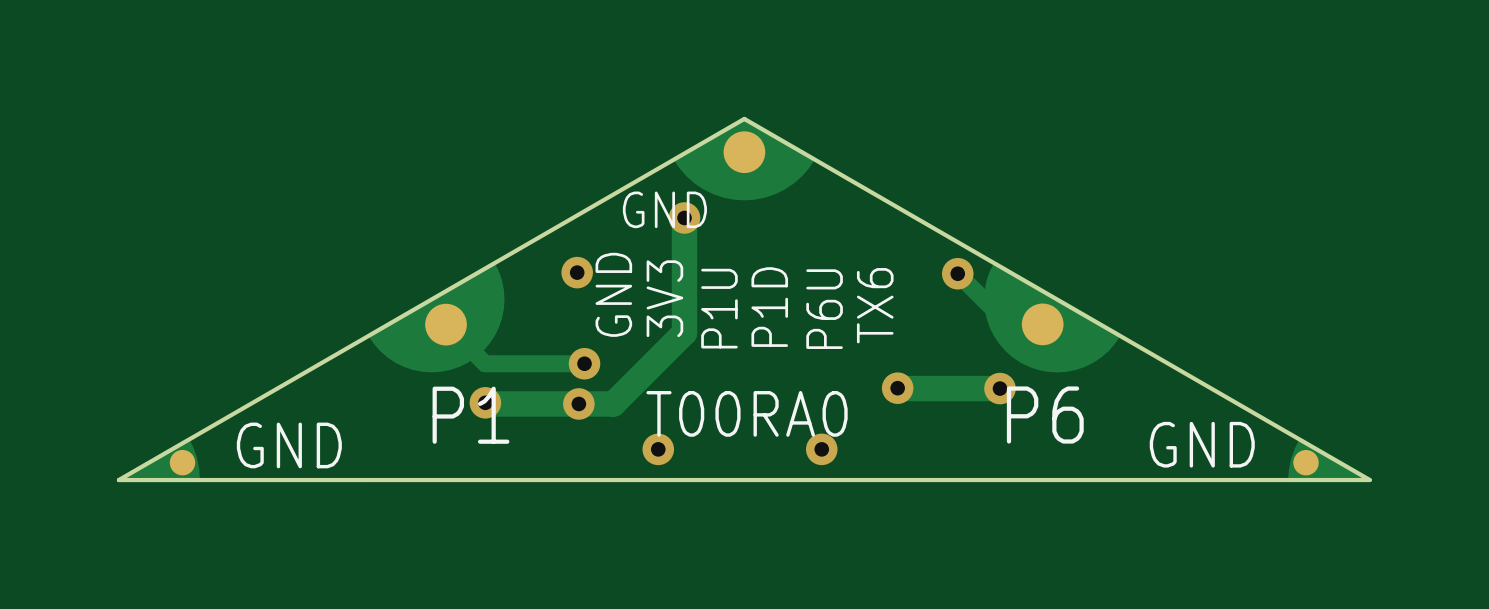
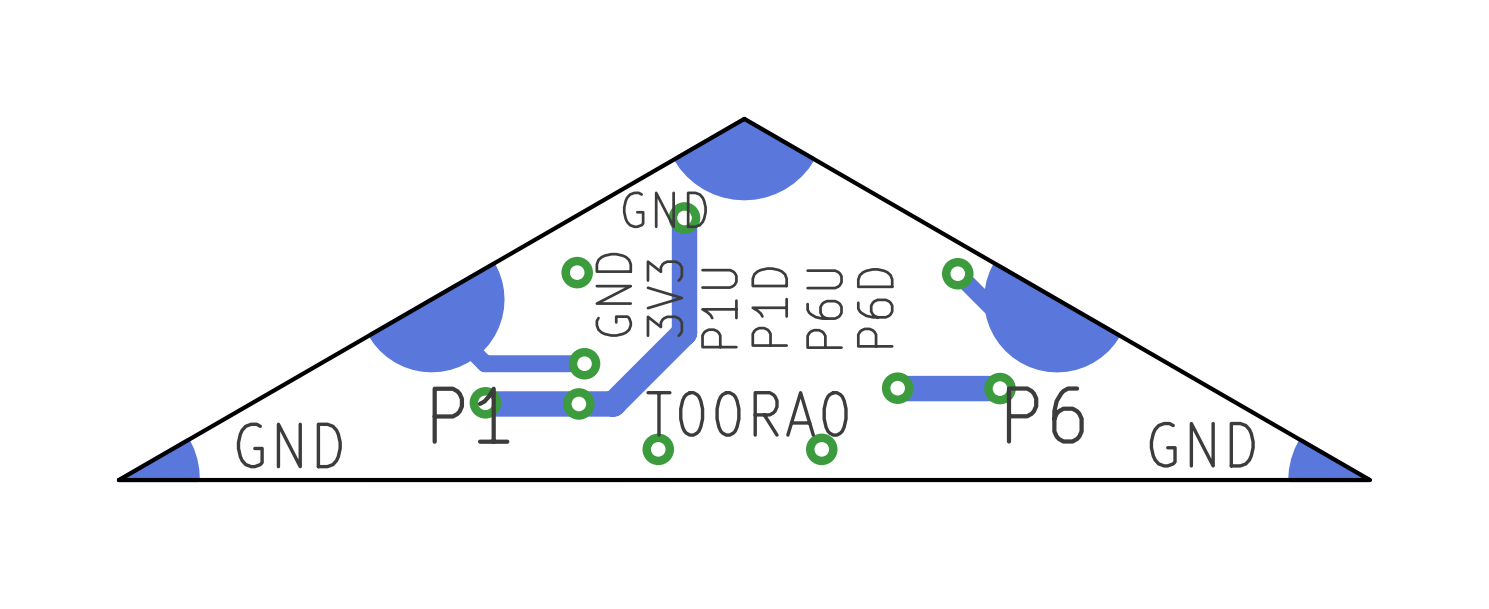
text: TX6 (875, 305) -> P6D (875, 307)

